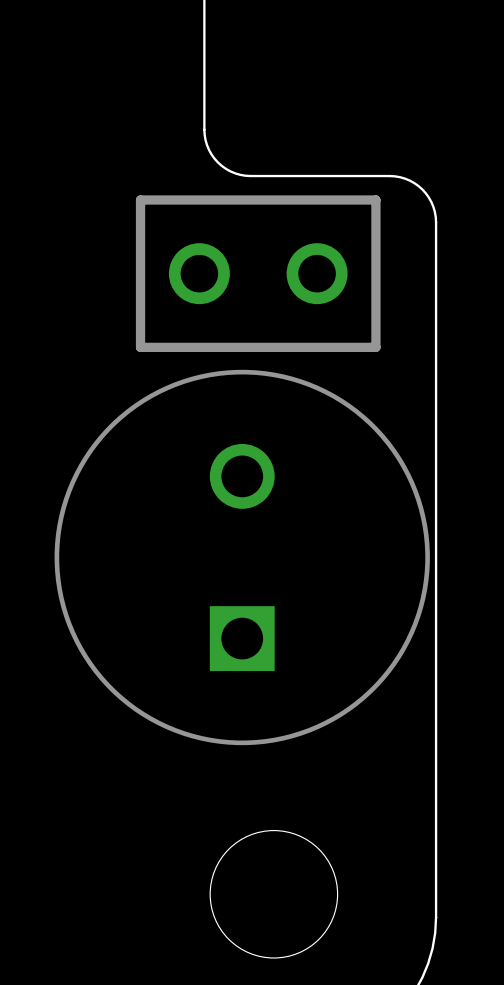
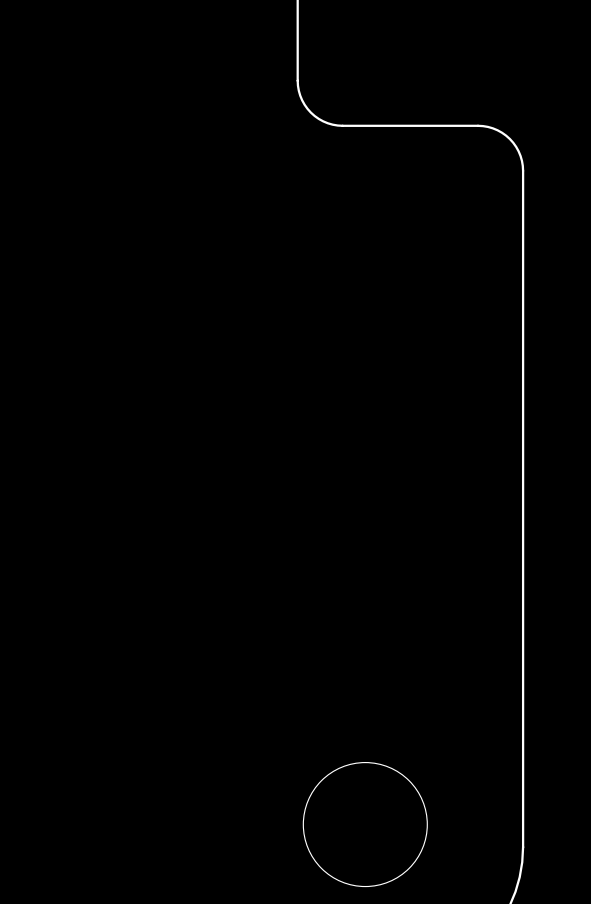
part: (258, 273) -> none
part: (242, 557) -> none

